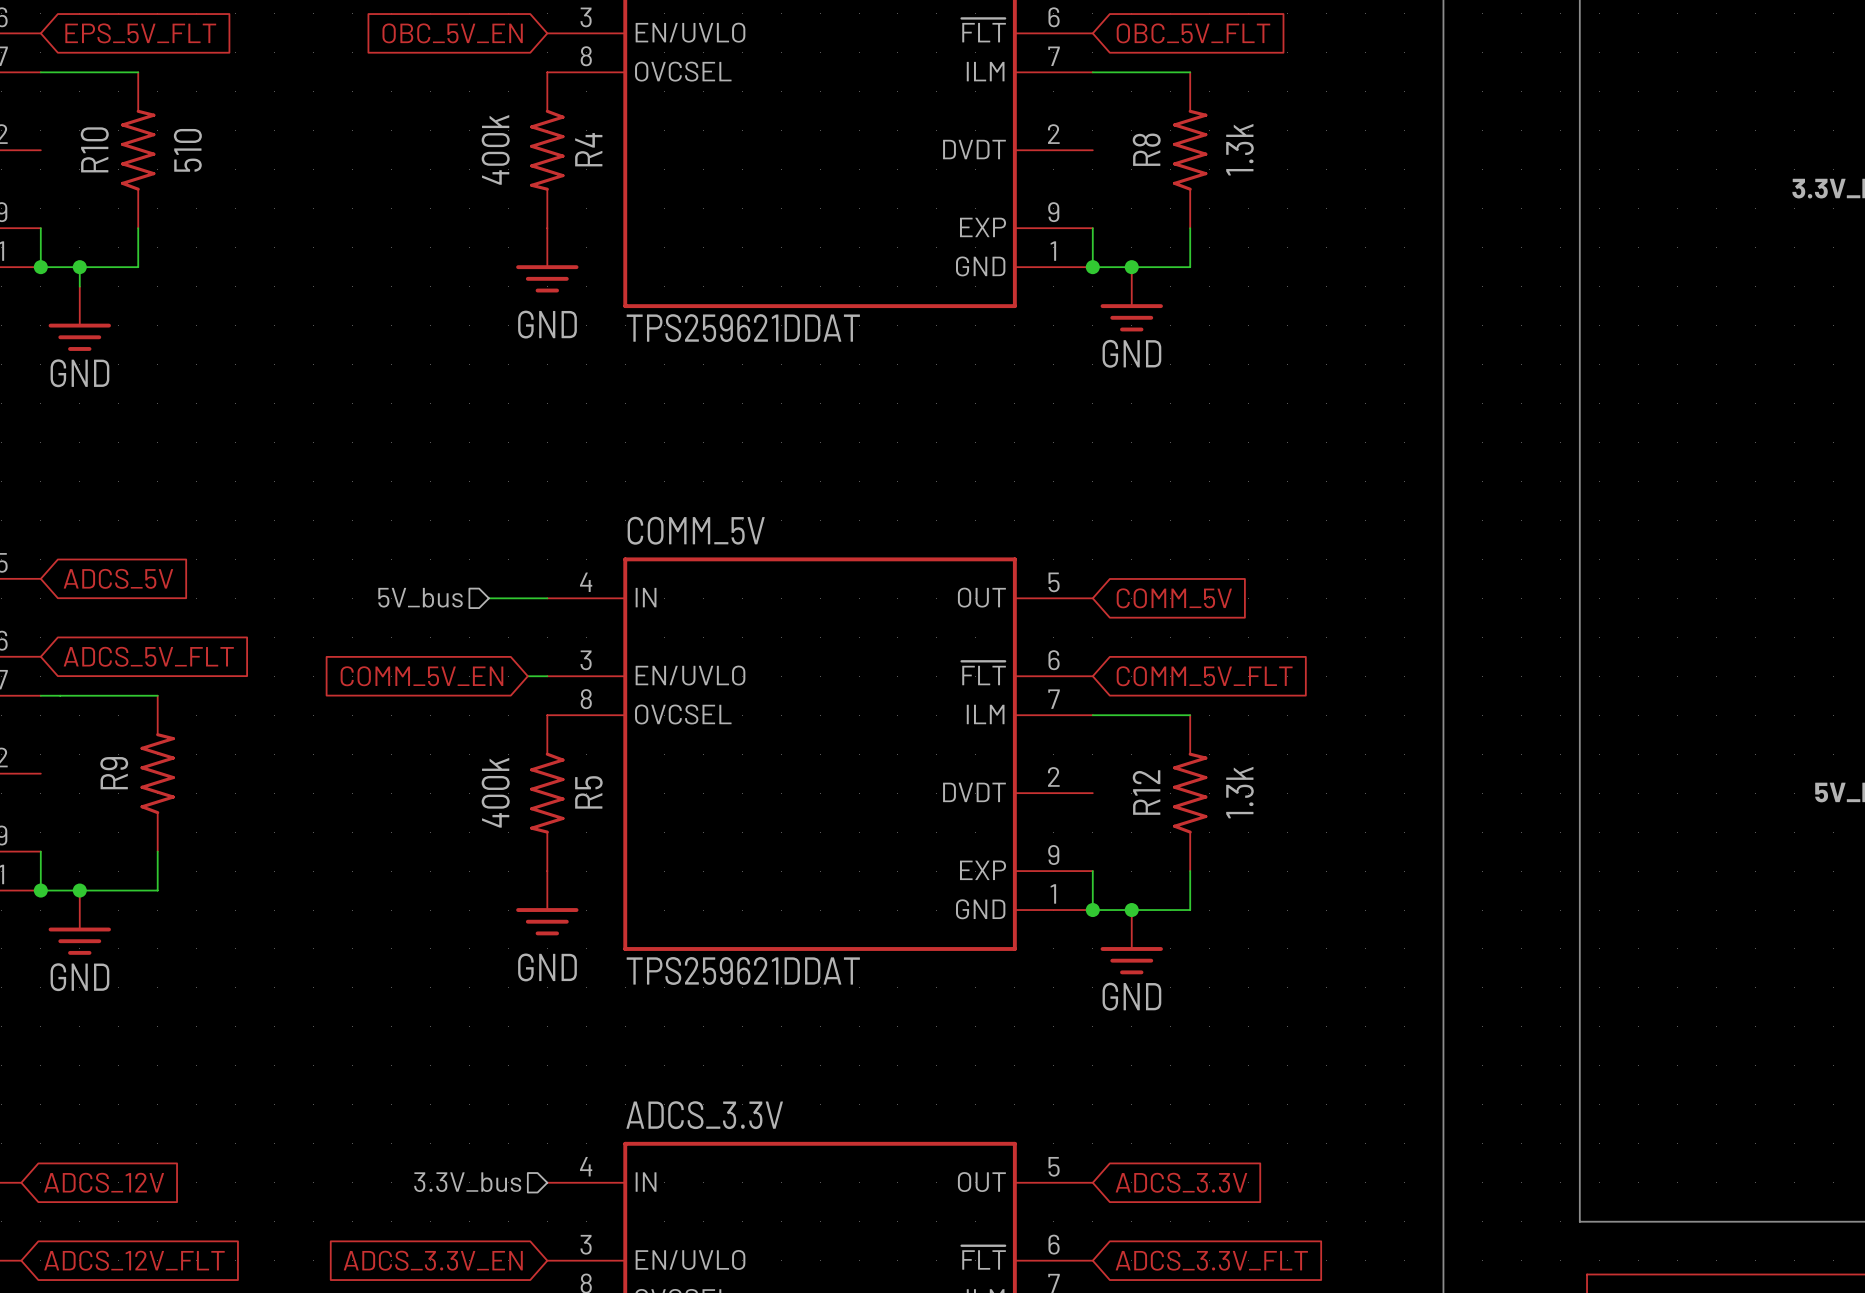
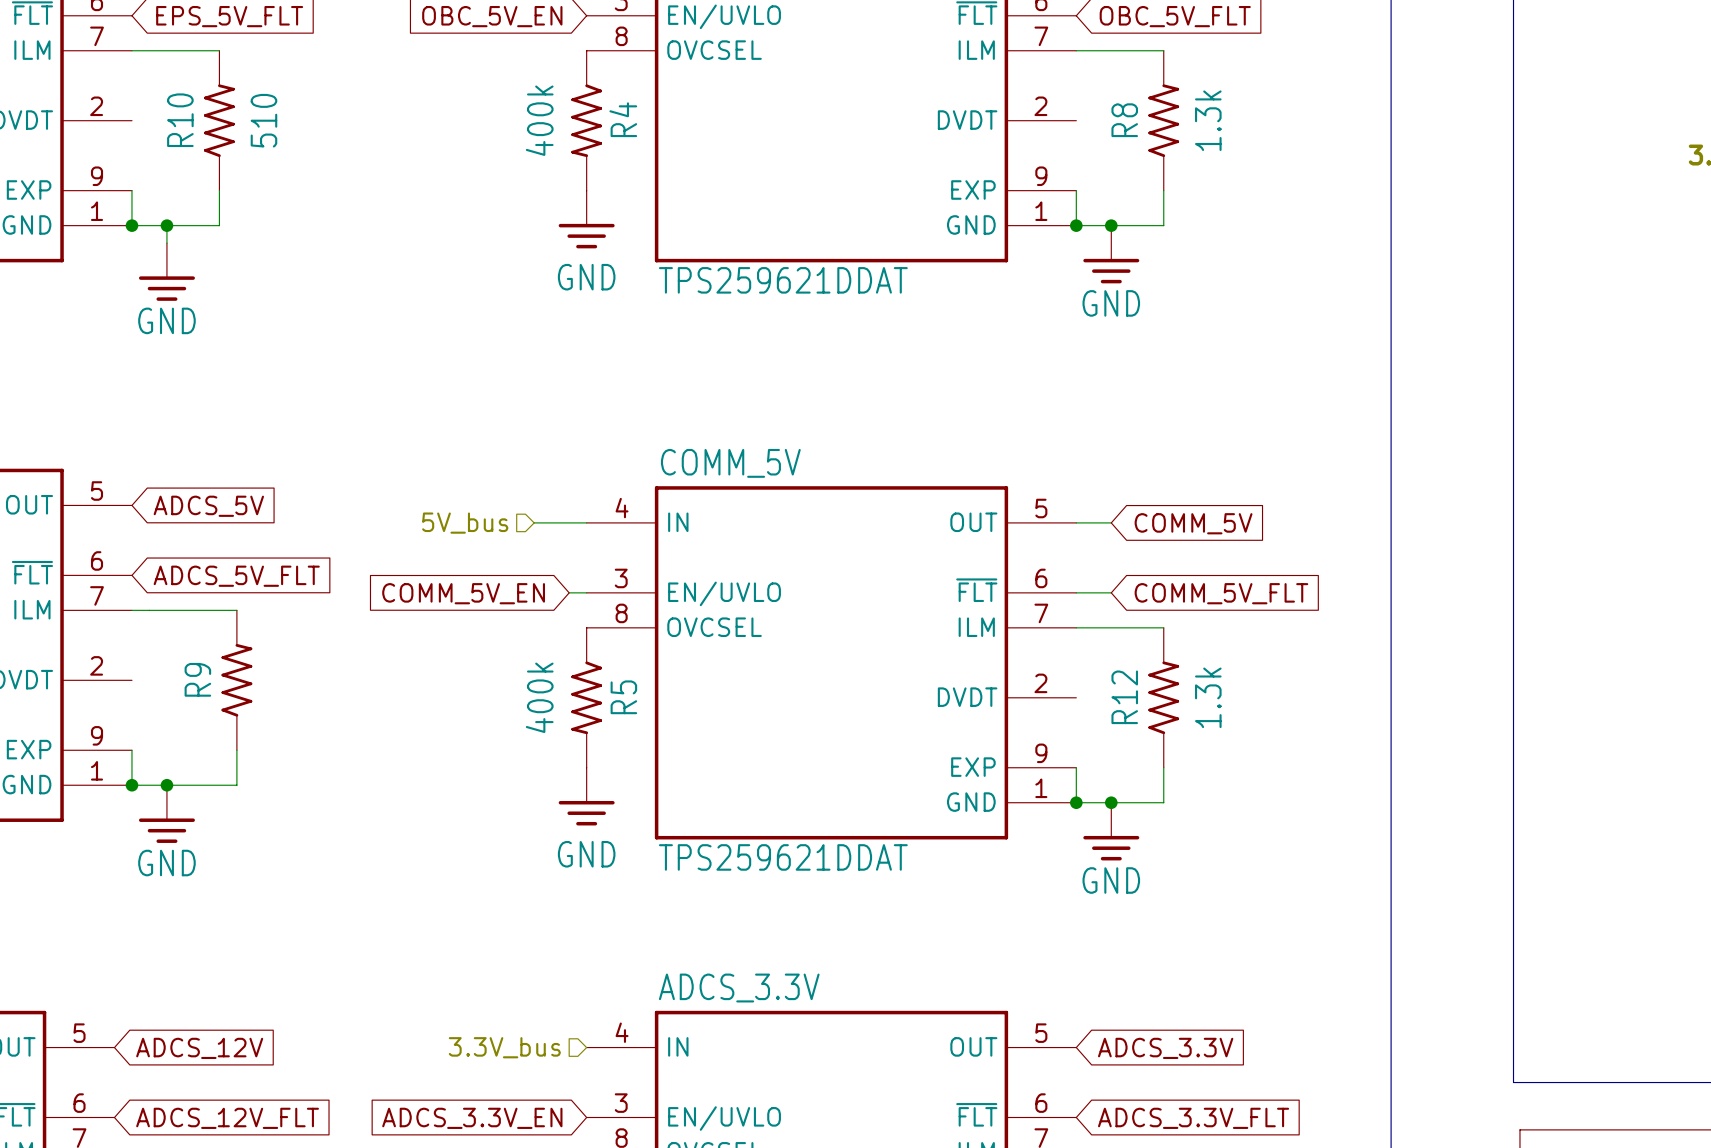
wire: none -> (1076, 522) (1111, 522)
global label position: COMM_5V (1174, 598) -> COMM_5V (1193, 523)
wire: none -> (1076, 592) (1111, 592)
global label position: COMM_5V_FLT (1204, 676) -> COMM_5V_FLT (1221, 593)

